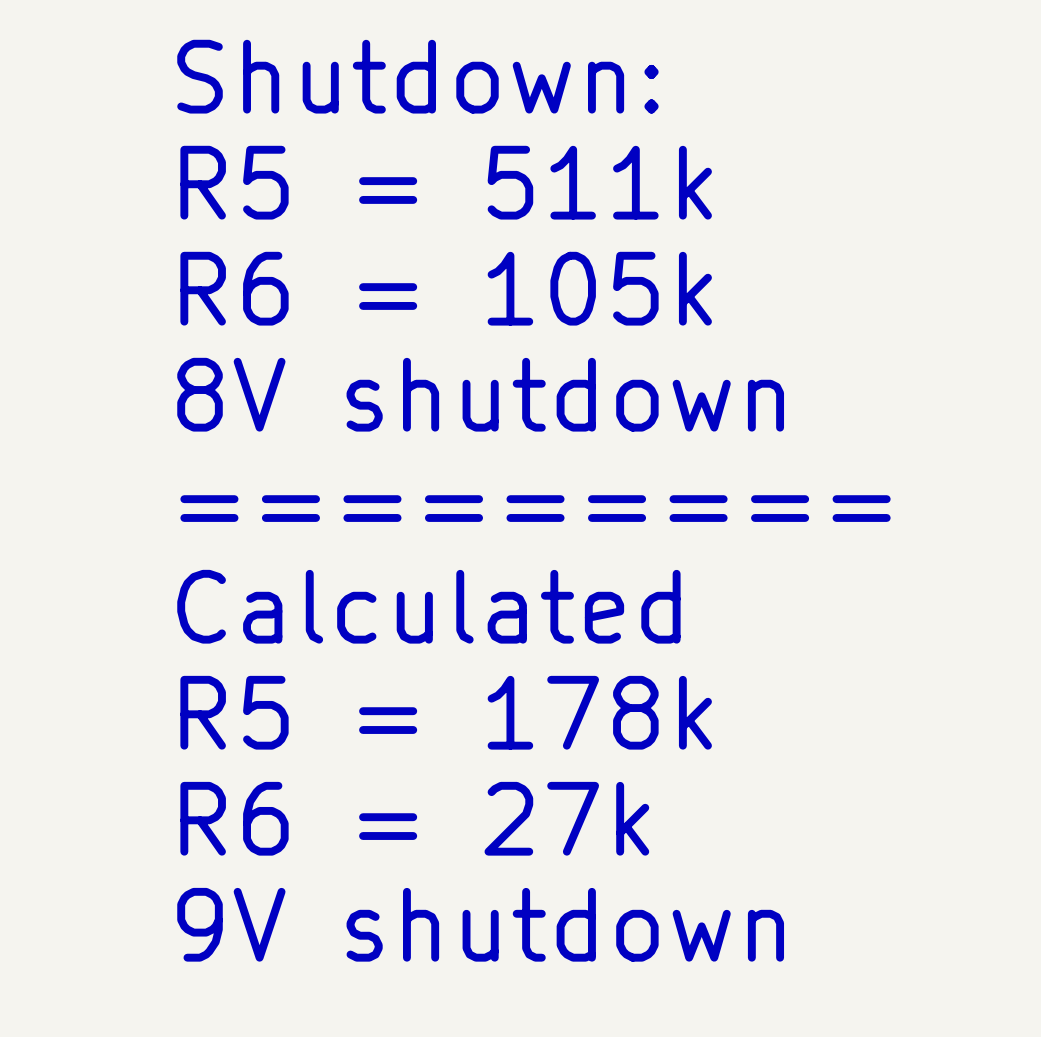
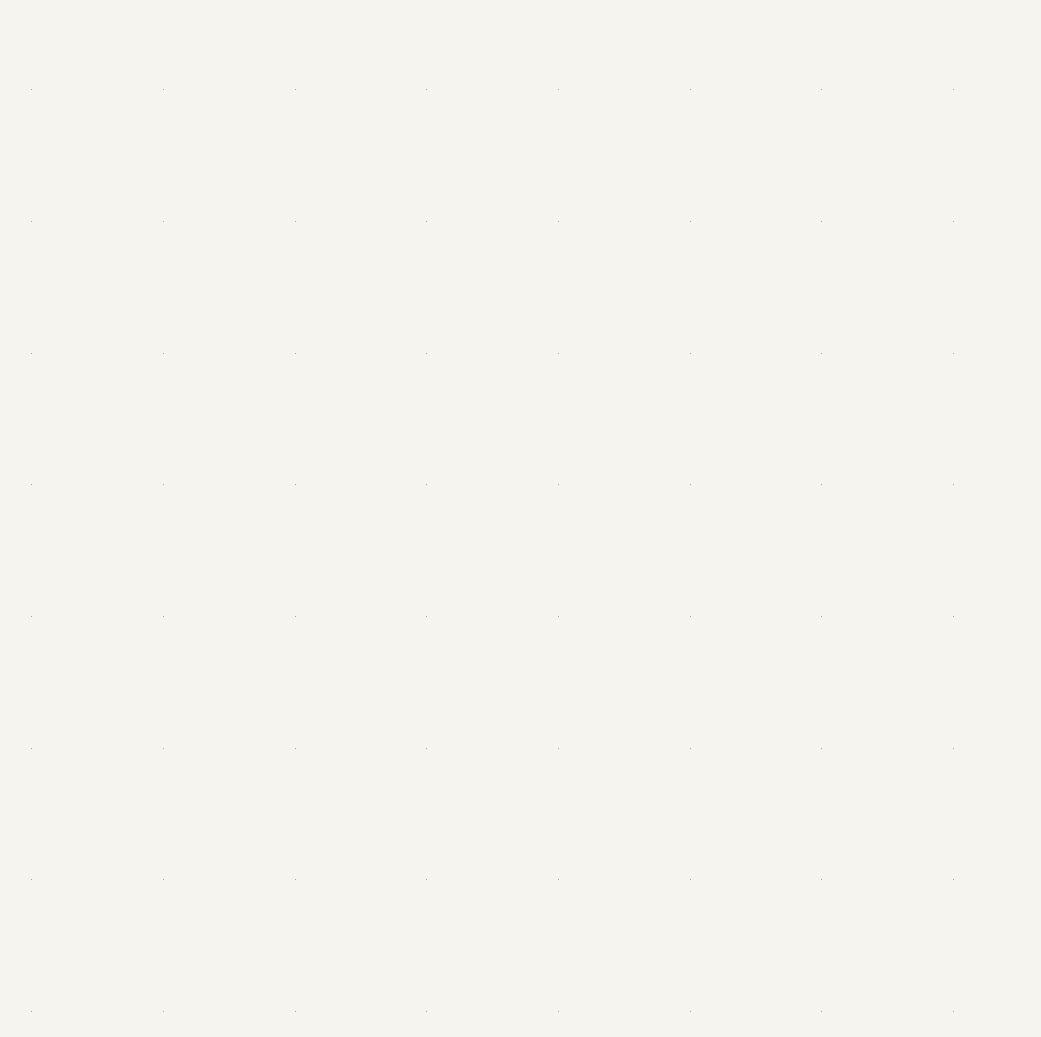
text: Shutdown: (417, 76) -> none
text: R5 = 511k (446, 182) -> none
text: R6 = 105k (446, 288) -> none
text: 8V shutdown (480, 394) -> none
text: ========= (535, 508) -> none
text: Calculated (428, 606) -> none
text: R5 = 178k (446, 712) -> none
text: R6 = 27k (414, 818) -> none
text: 9V shutdown (480, 924) -> none

